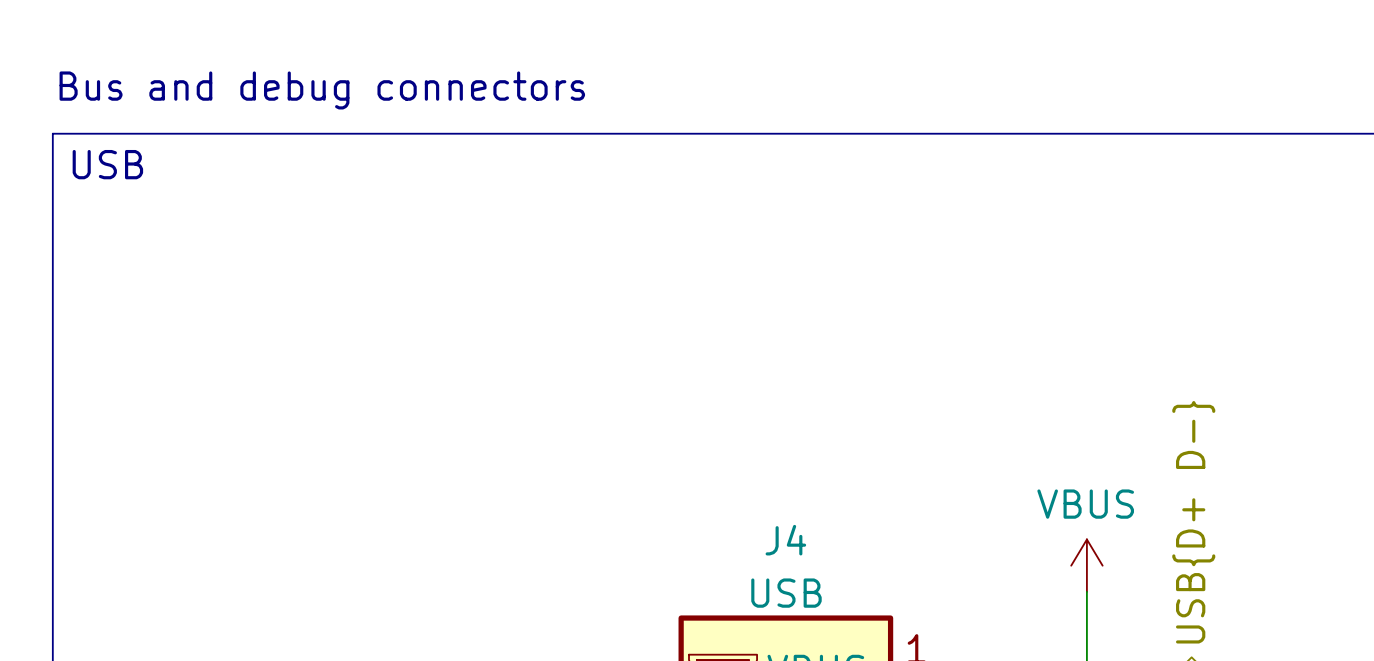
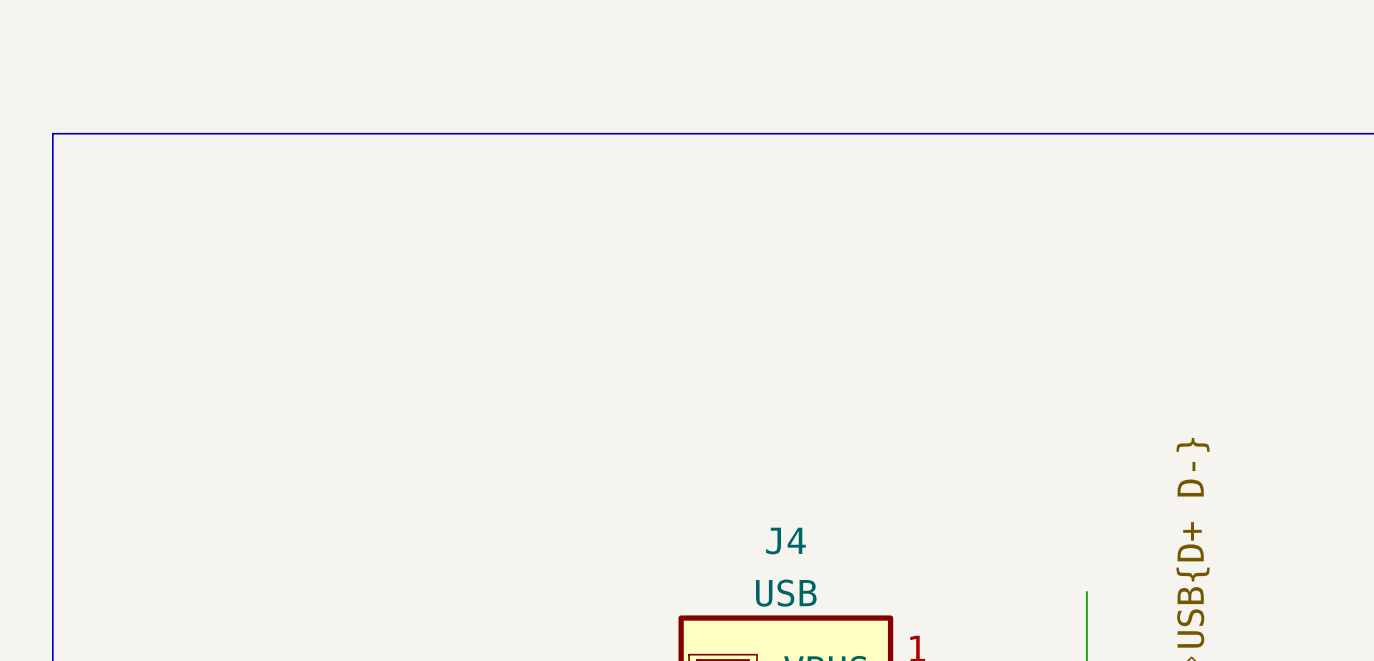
text: Bus and debug connectors (322, 90) -> none
text: USB (107, 164) -> none
power symbol: VBUS (1086, 565) -> none

